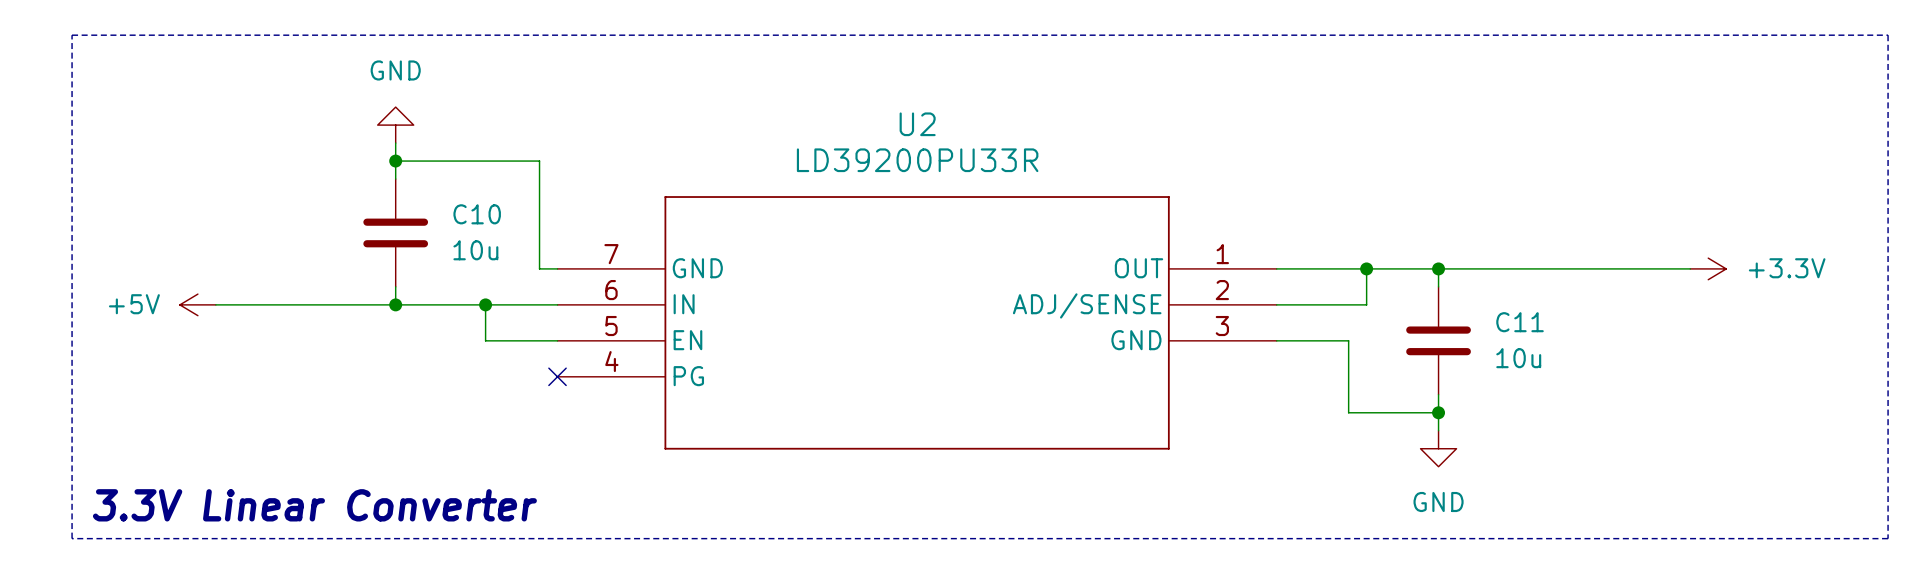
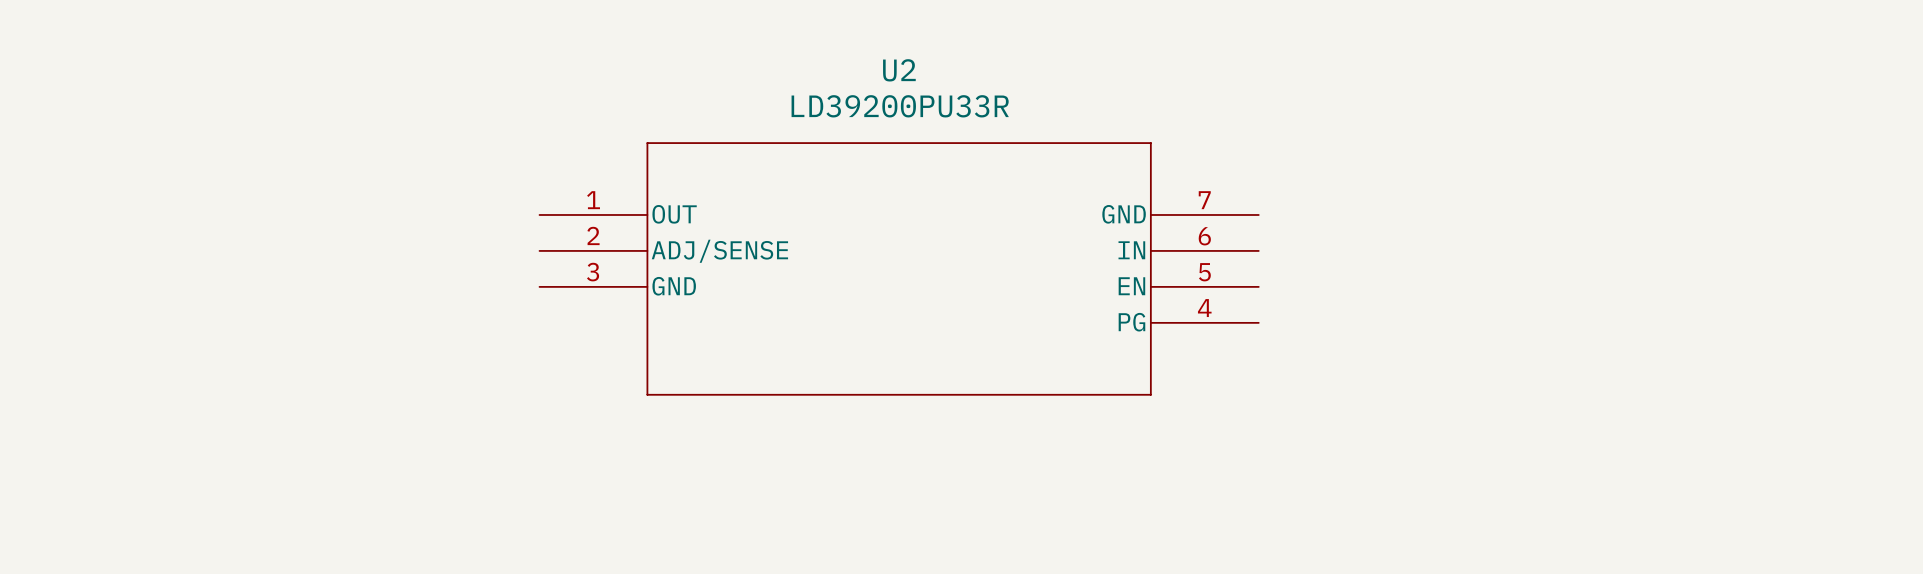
line: (72, 35) (1888, 35) (1888, 538) (72, 538) (72, 35) -> none
power symbol: GND (395, 125) -> none
wire: (395, 143) (395, 179) -> none
wire: (395, 161) (539, 161) (539, 268) (557, 268) -> none
junction: (395, 161) -> none
C10: 10u (395, 232) -> none
wire: (1276, 268) (1690, 268) -> none
wire: (1366, 268) (1366, 304) (1276, 304) -> none
junction: (1366, 268) -> none
wire: (1438, 268) (1438, 286) -> none
junction: (1438, 268) -> none
power symbol: +3.3V (1708, 268) -> none
wire: (395, 286) (395, 304) -> none
power symbol: +5V (197, 304) -> none
wire: (215, 304) (557, 304) -> none
junction: (395, 304) -> none
wire: (485, 304) (485, 340) (557, 340) -> none
junction: (485, 304) -> none
U2 flip: as is (917, 322) -> left-right (899, 268)
wire: (1276, 340) (1348, 340) (1348, 412) (1438, 412) -> none
C11: 10u (1438, 340) -> none
no-connect mark: (557, 376) -> none
wire: (1438, 394) (1438, 430) -> none
junction: (1438, 412) -> none
power symbol: GND (1438, 448) -> none
text: 3.3V Linear Converter (314, 505) -> none

